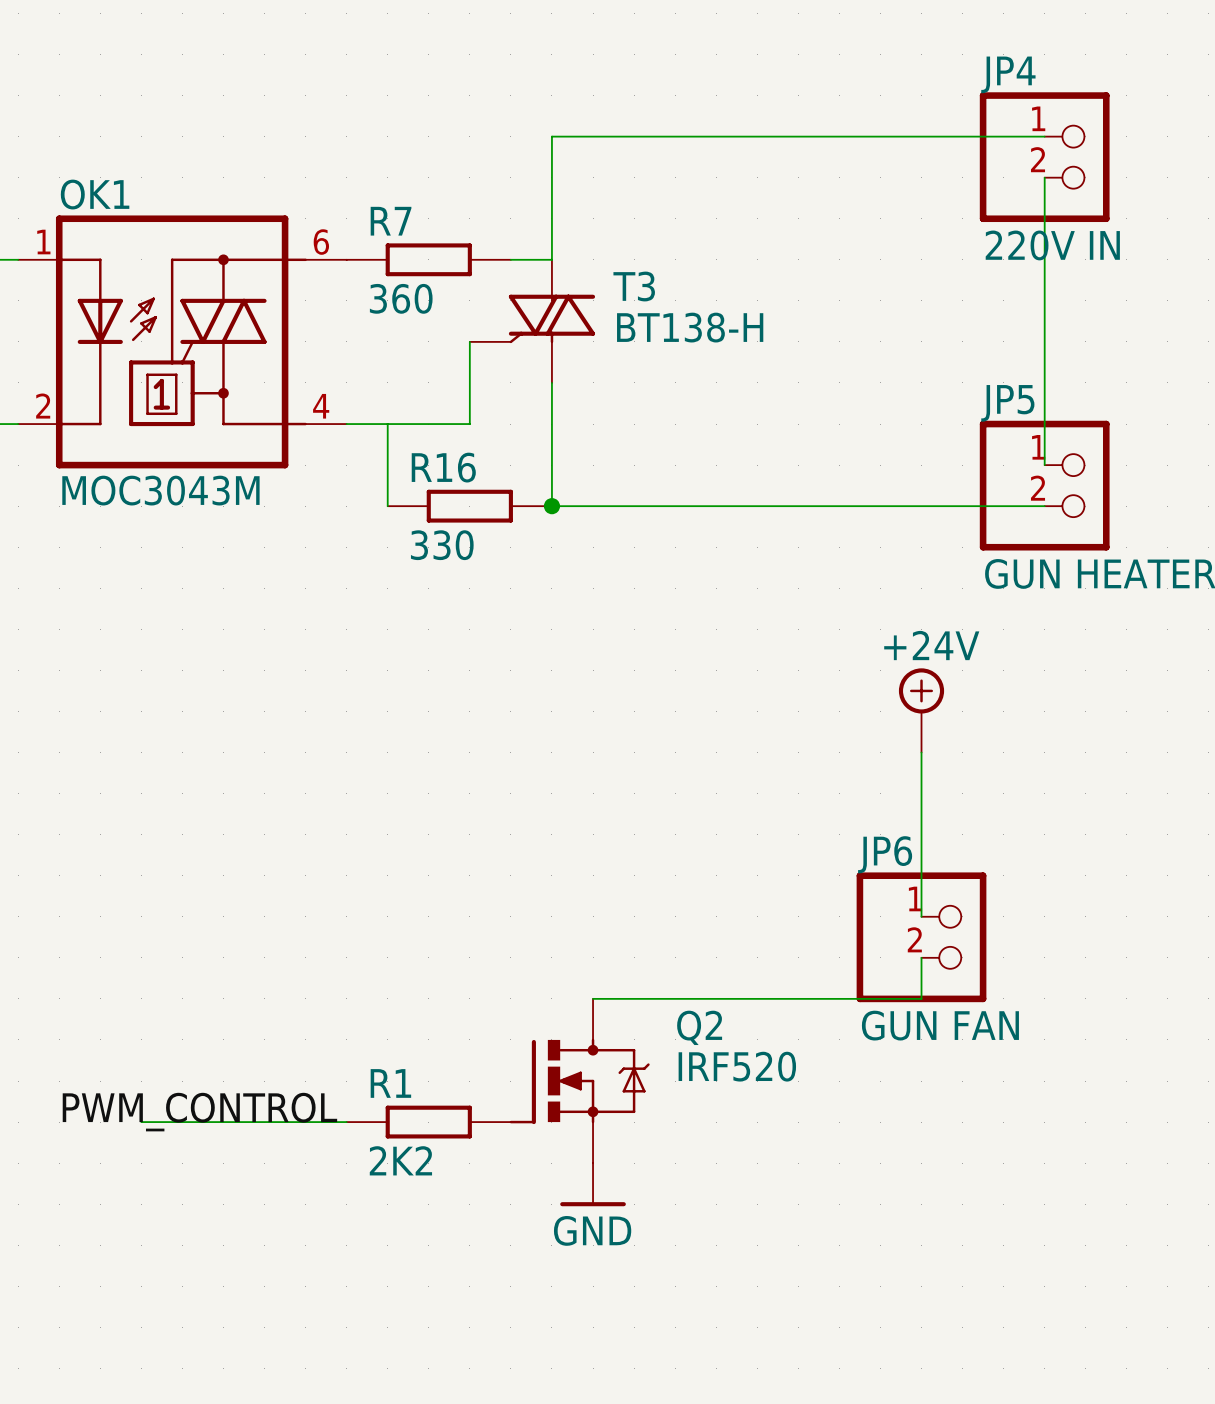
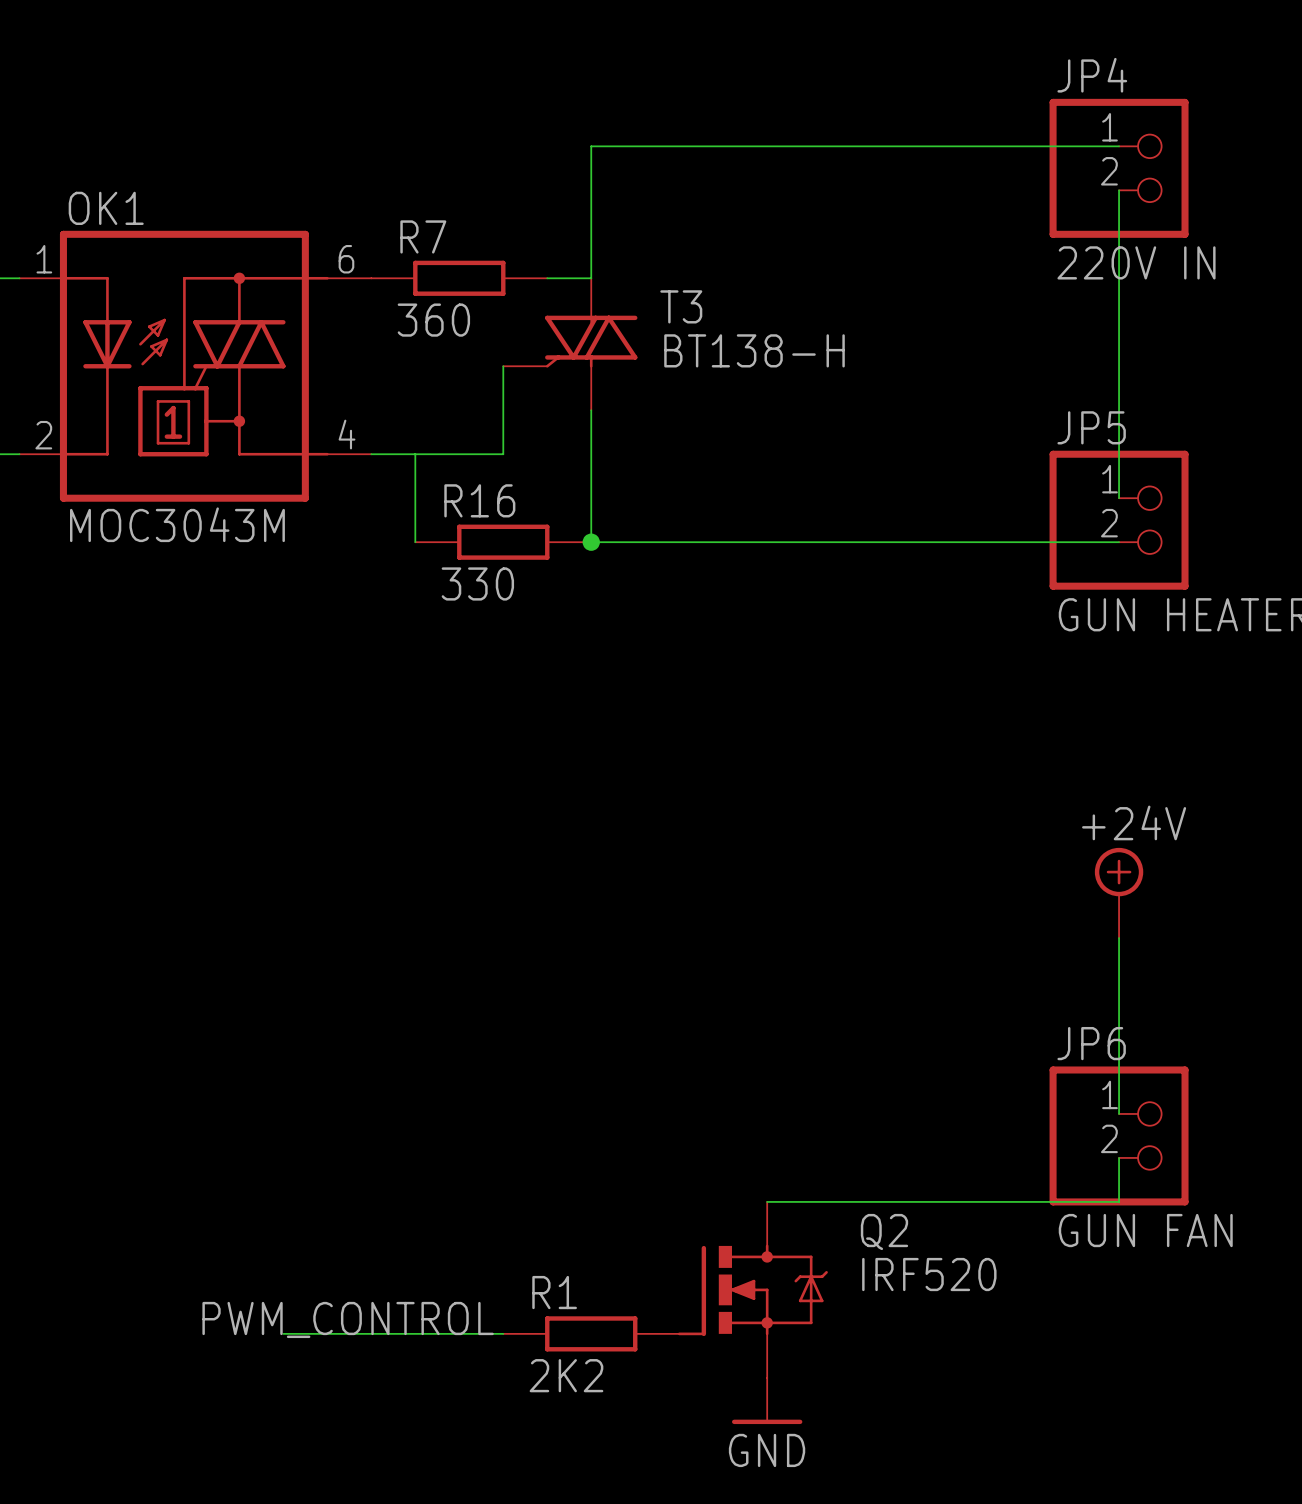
power symbol position: +24V (921, 710) -> +24V (1119, 892)
wire: (921, 752) (921, 916) -> (1119, 938) (1119, 1113)
JP6 position: (921, 937) -> (1119, 1135)
wire: (921, 957) (921, 998) (593, 998) -> (1119, 1157) (1119, 1201) (767, 1201)
Q2 position: (579, 1081) -> (752, 1289)
label position: PWM_CONTROL (199, 1112) -> PWM_CONTROL (348, 1319)
wire: (141, 1122) (346, 1122) -> (283, 1333) (503, 1333)
R1 position: (428, 1122) -> (591, 1333)
power symbol position: GND (593, 1184) -> GND (767, 1400)

